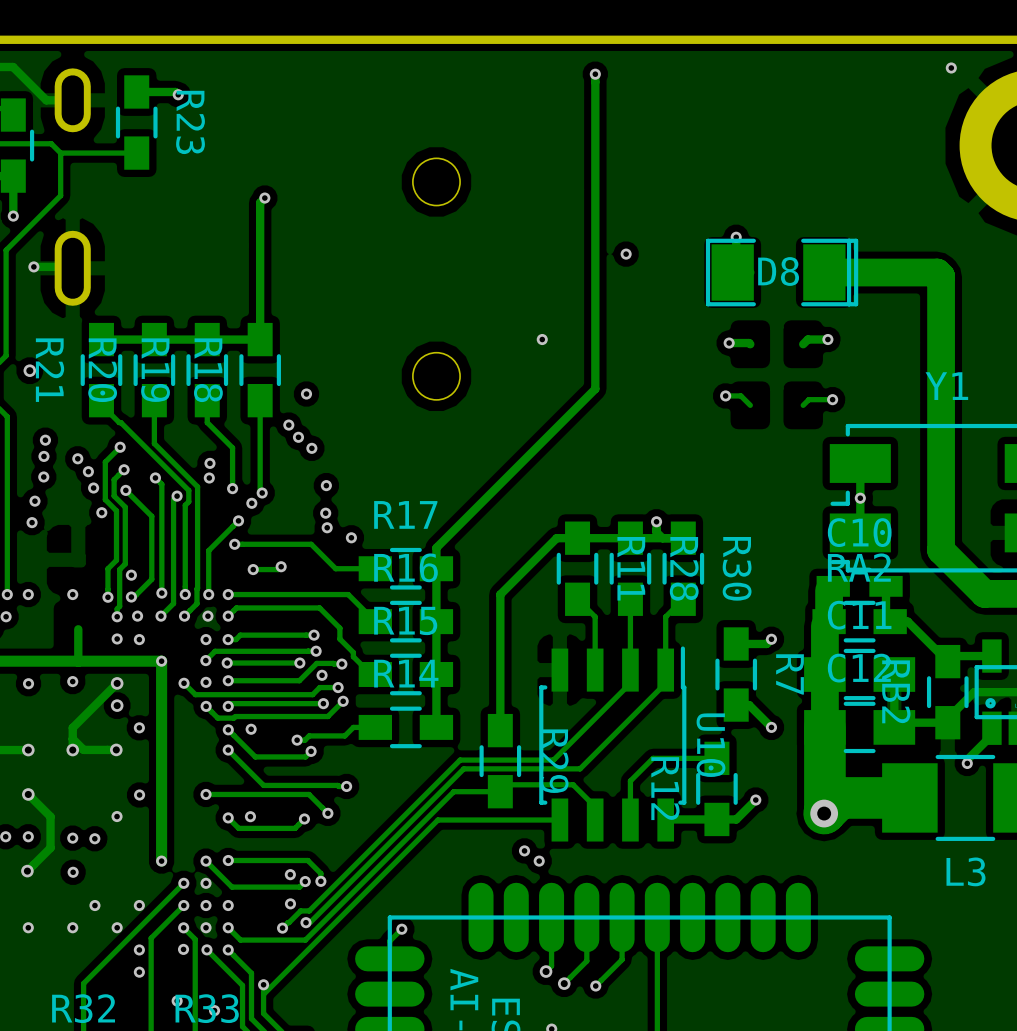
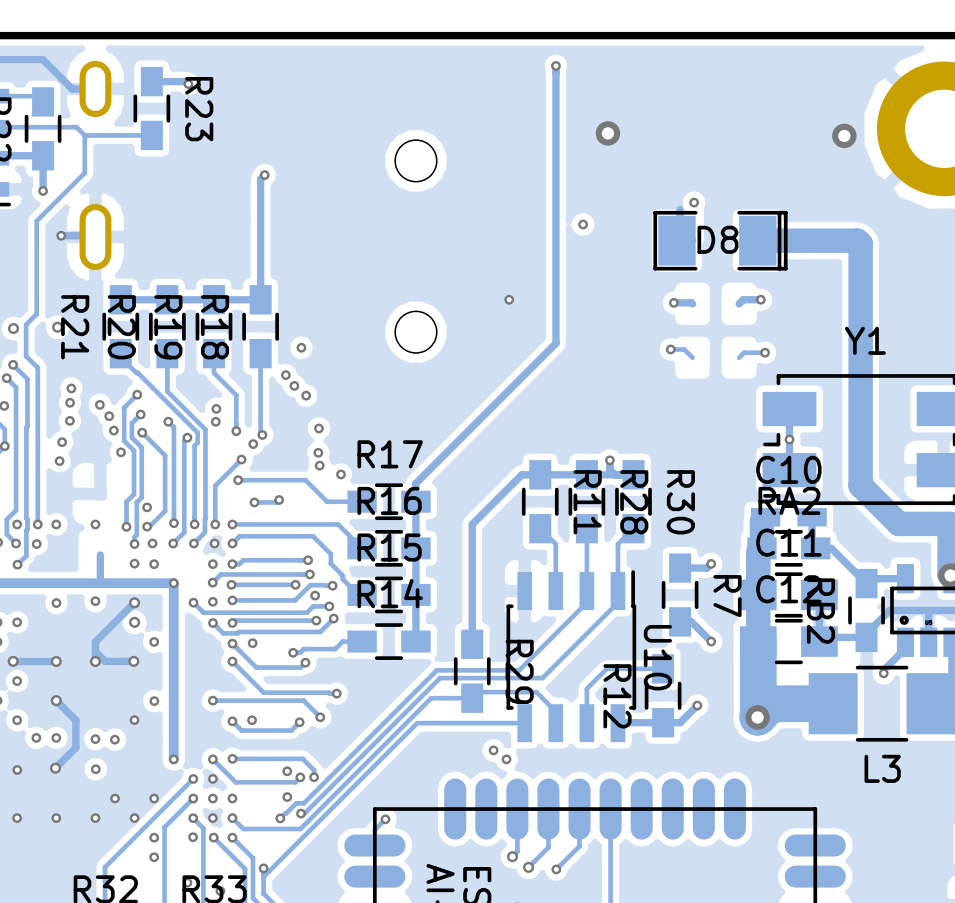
via: (951, 67) -> none
via: none -> (607, 133)
via: none -> (844, 135)
via position: (736, 237) -> (694, 202)

